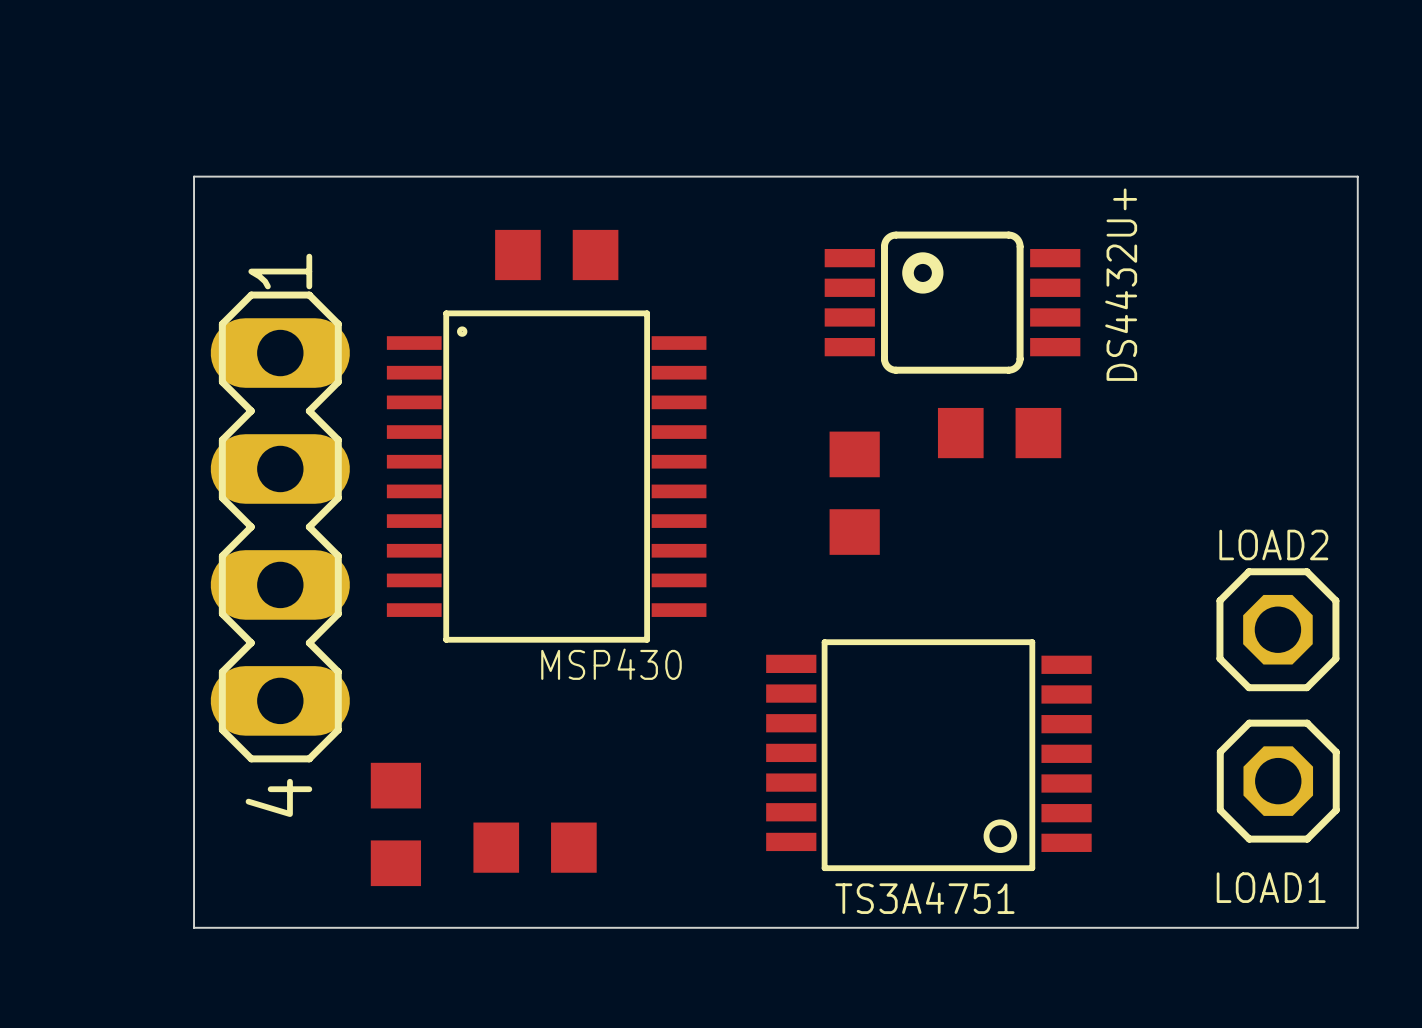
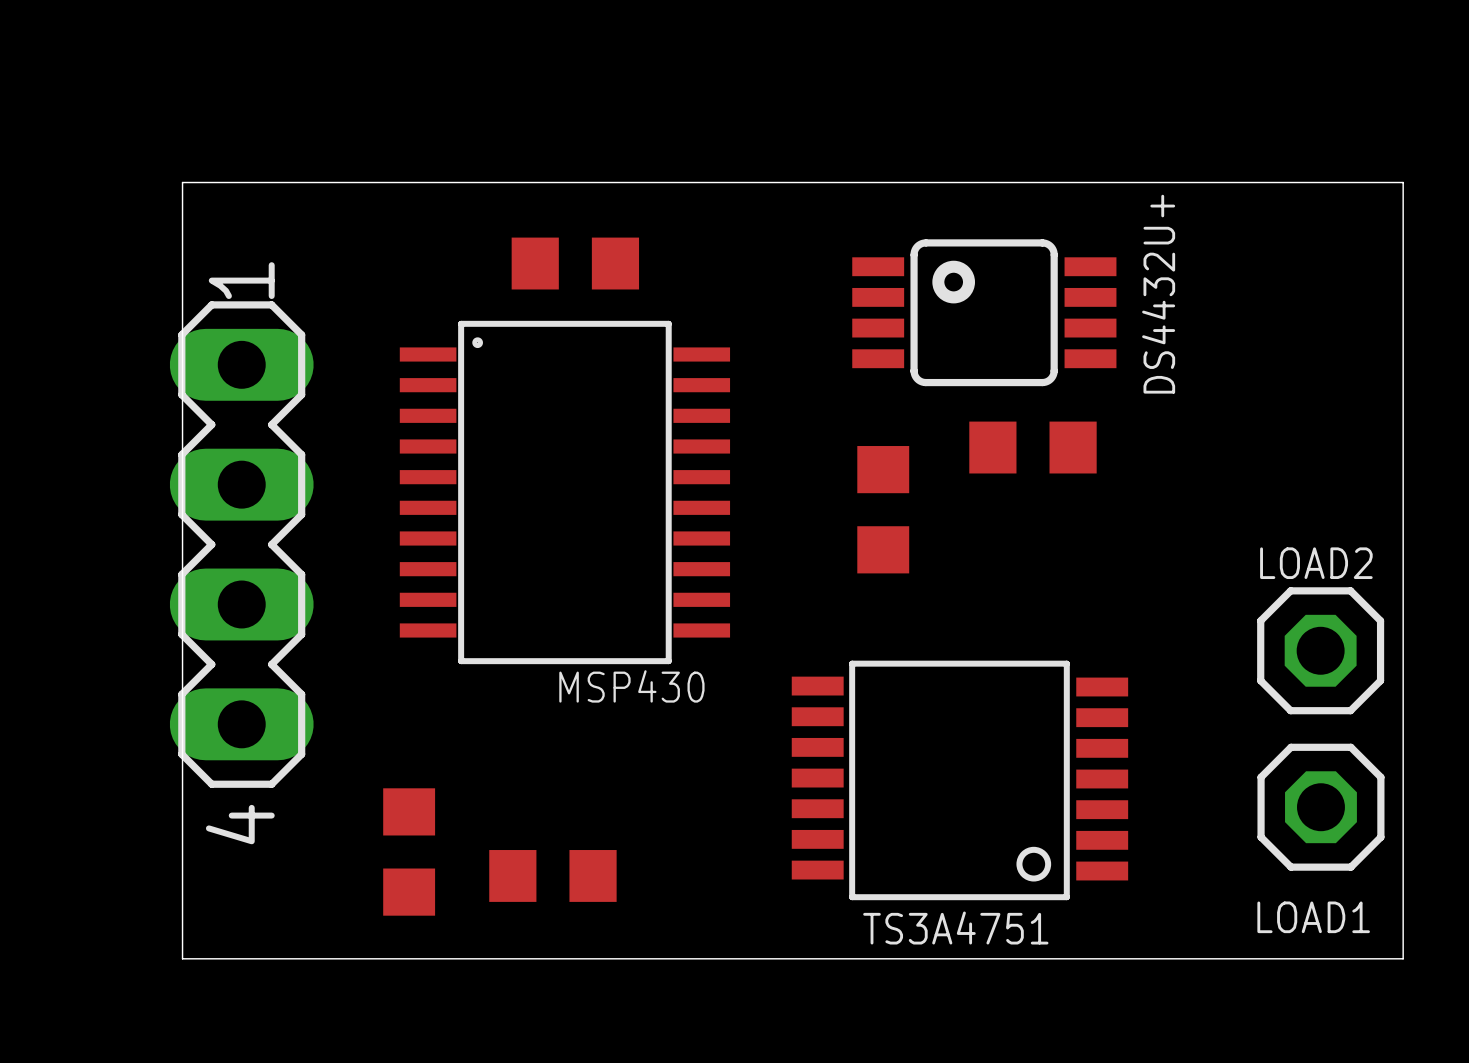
board edge: (194, 176) (194, 927) -> (200, 182) (182, 182) (182, 958) (200, 958)
part position: (280, 526) -> (241, 544)

